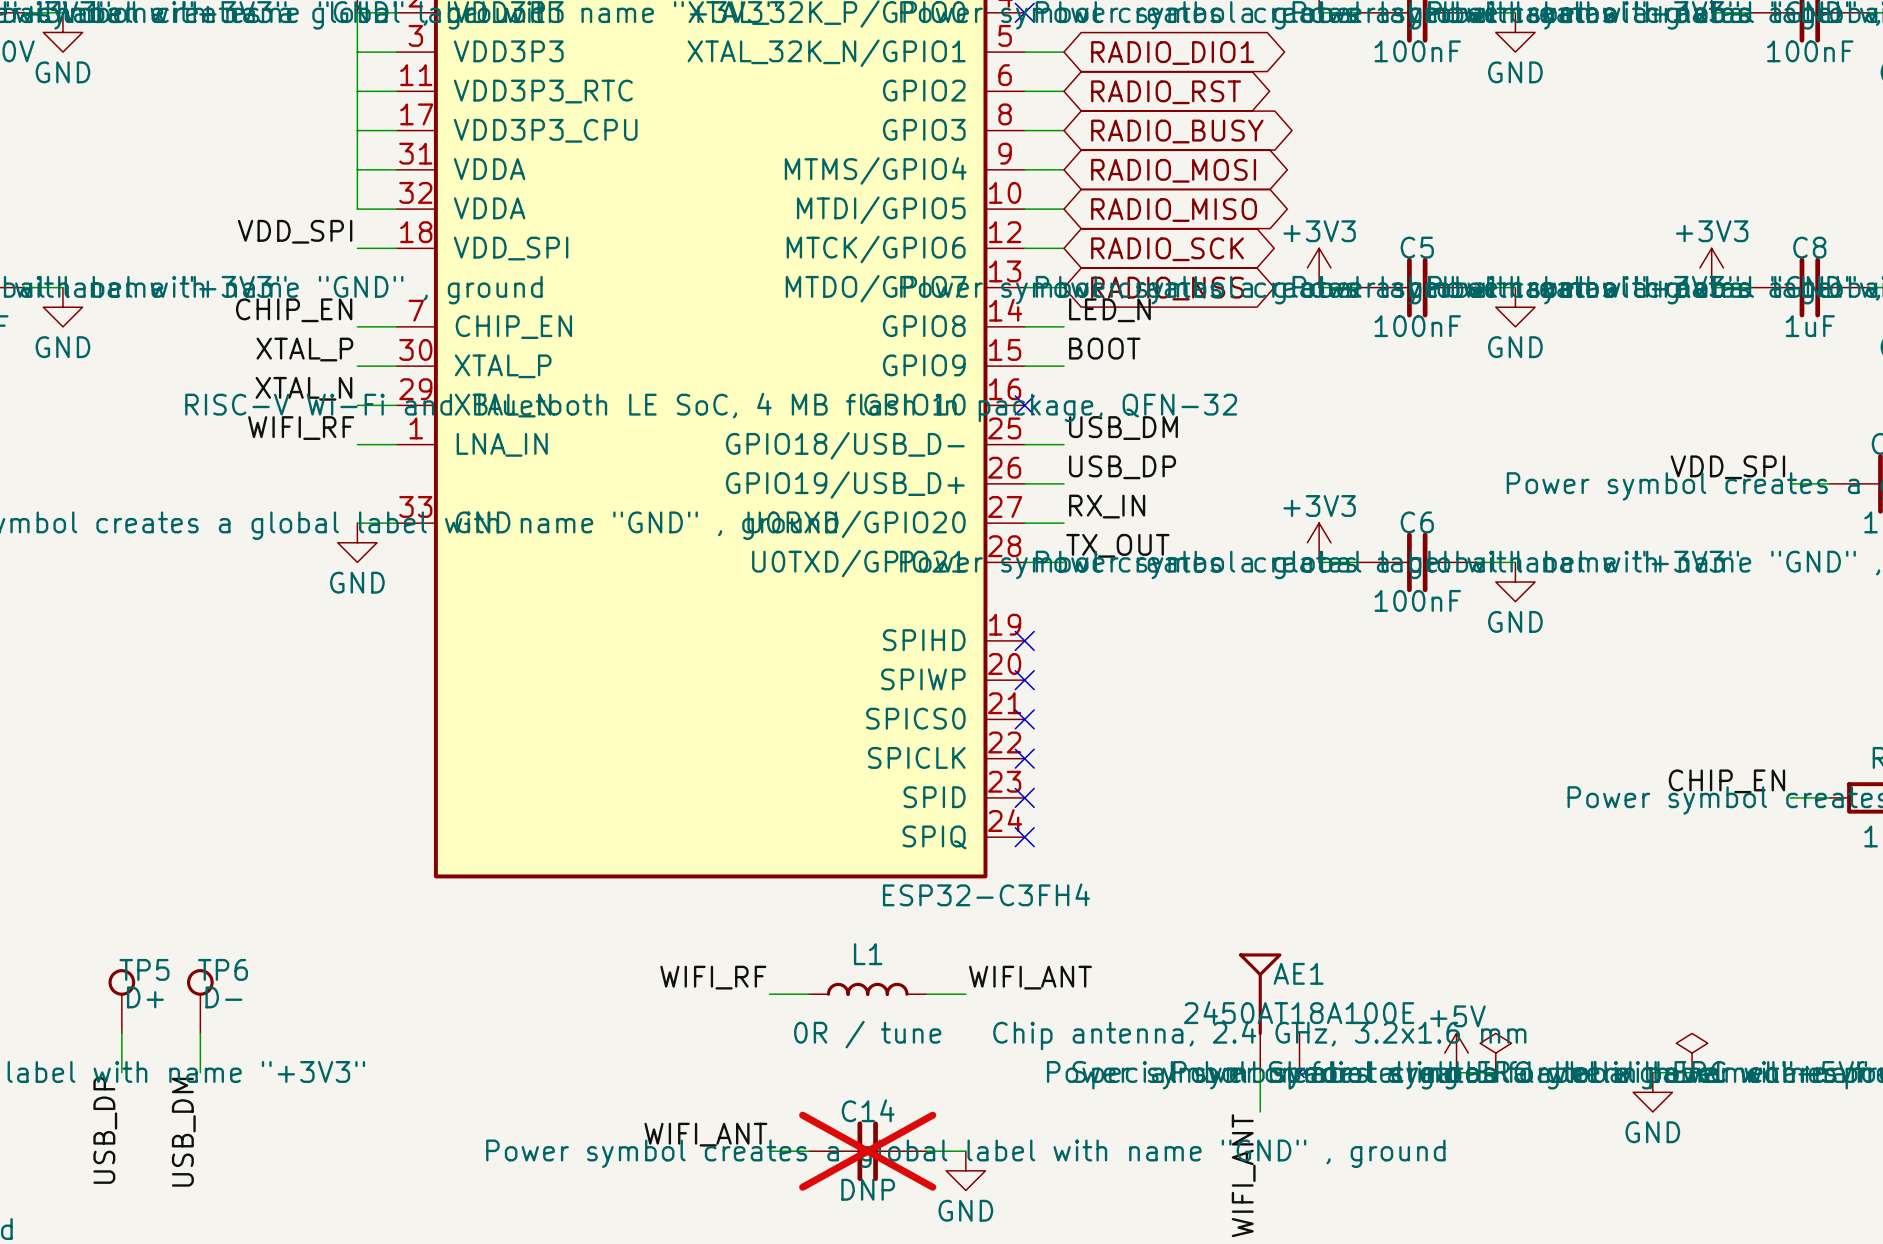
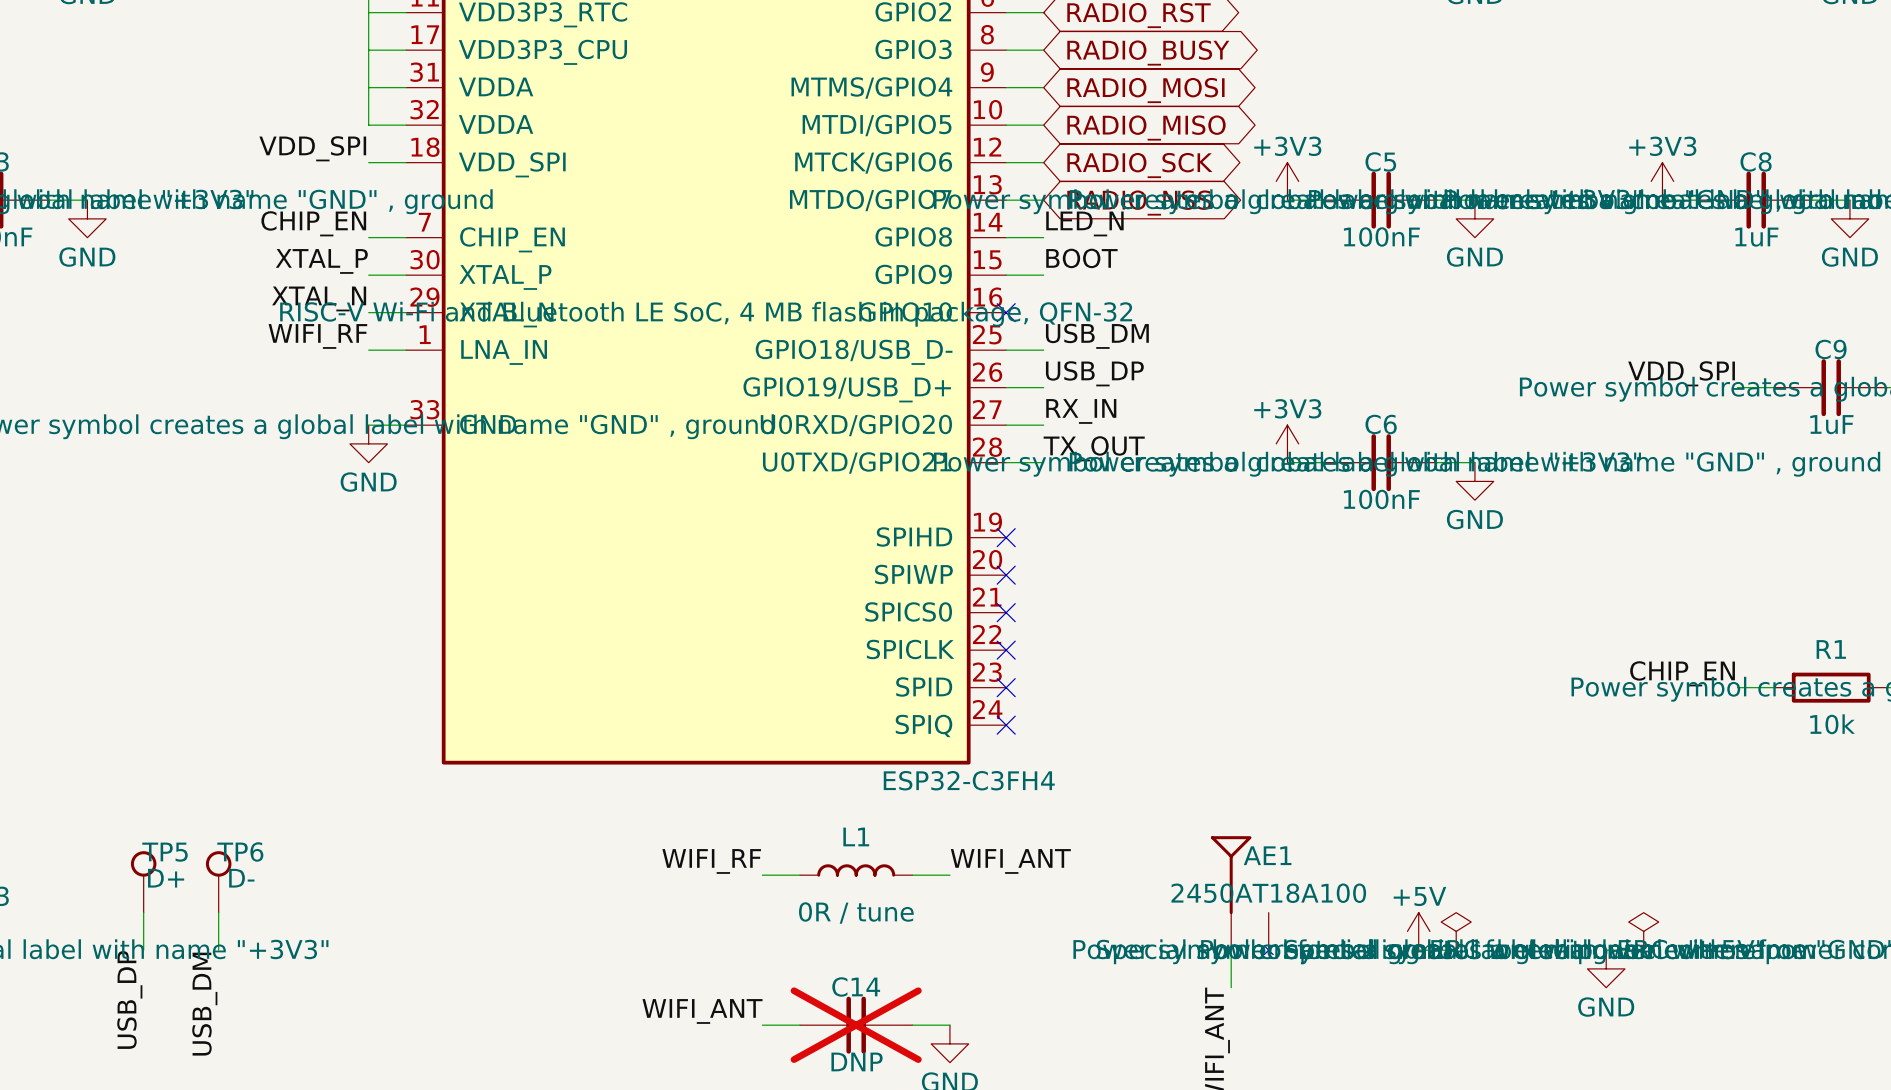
AE1 value: 2450AT18A100E (1299, 1012) -> 2450AT18A100 (1268, 893)
AE1 text: Chip antenna, 2.4 GHz, 3.2x1.6 mm (1259, 1035) -> none
power symbol text: Power symbol creates a global label with name "GND" , ground (965, 1153) -> none

